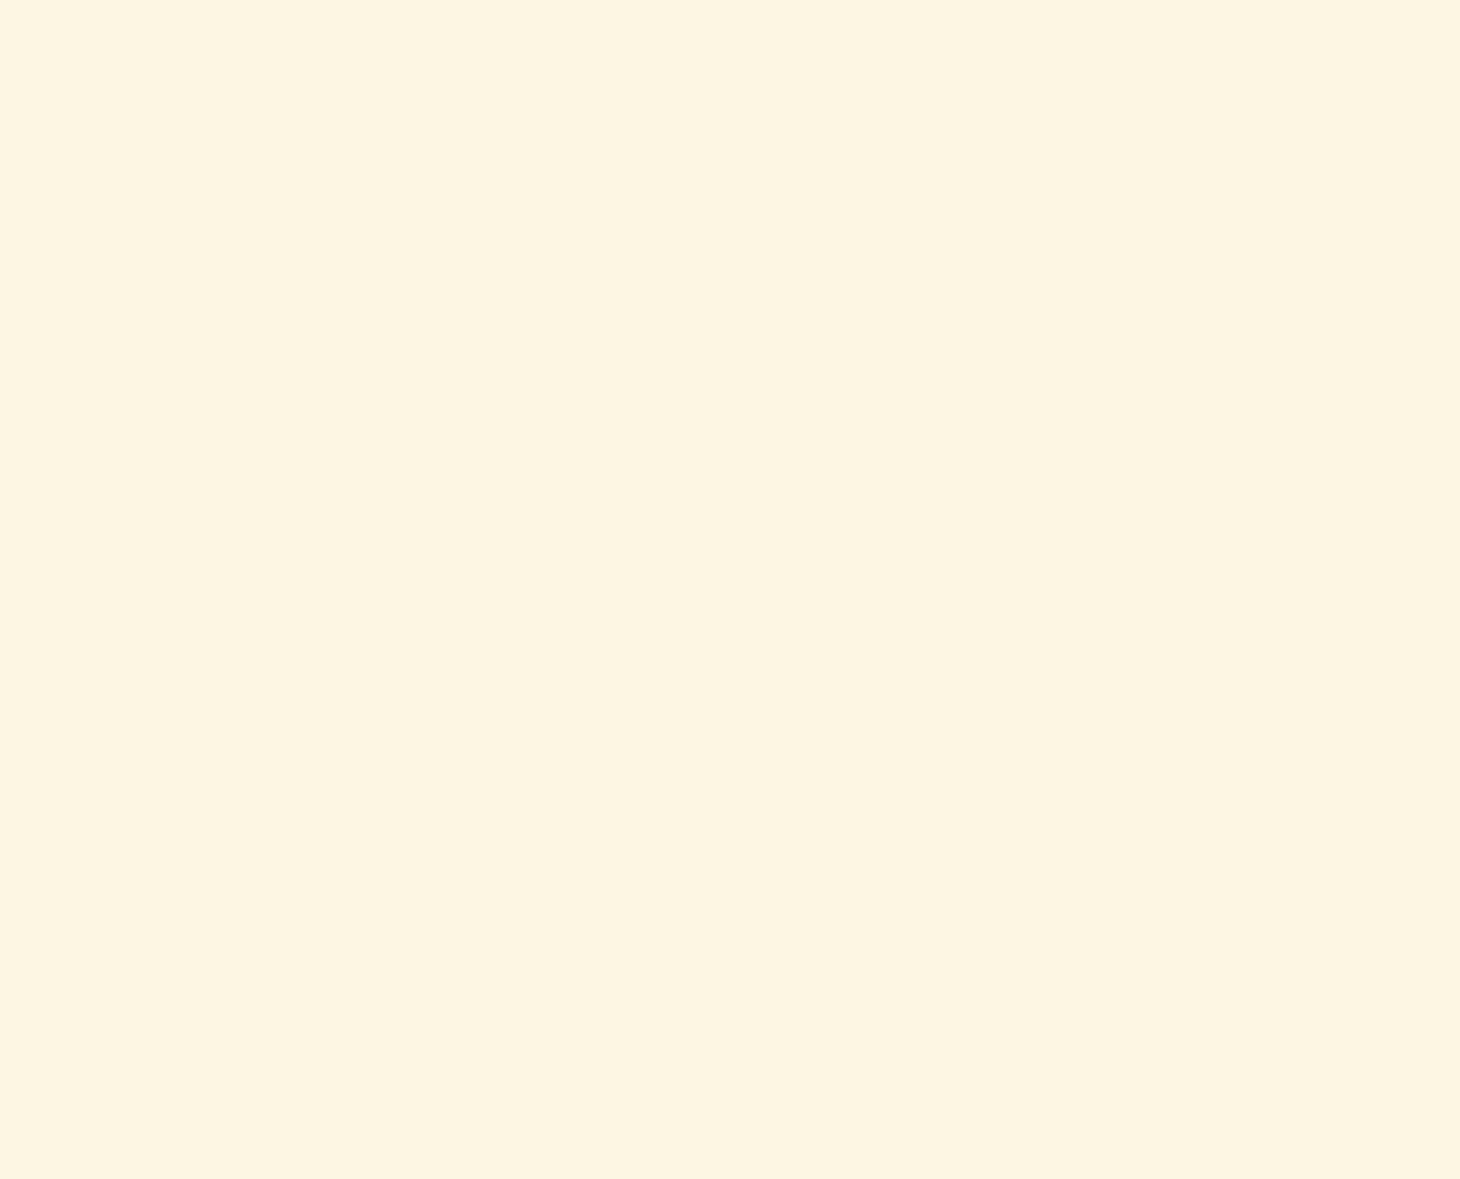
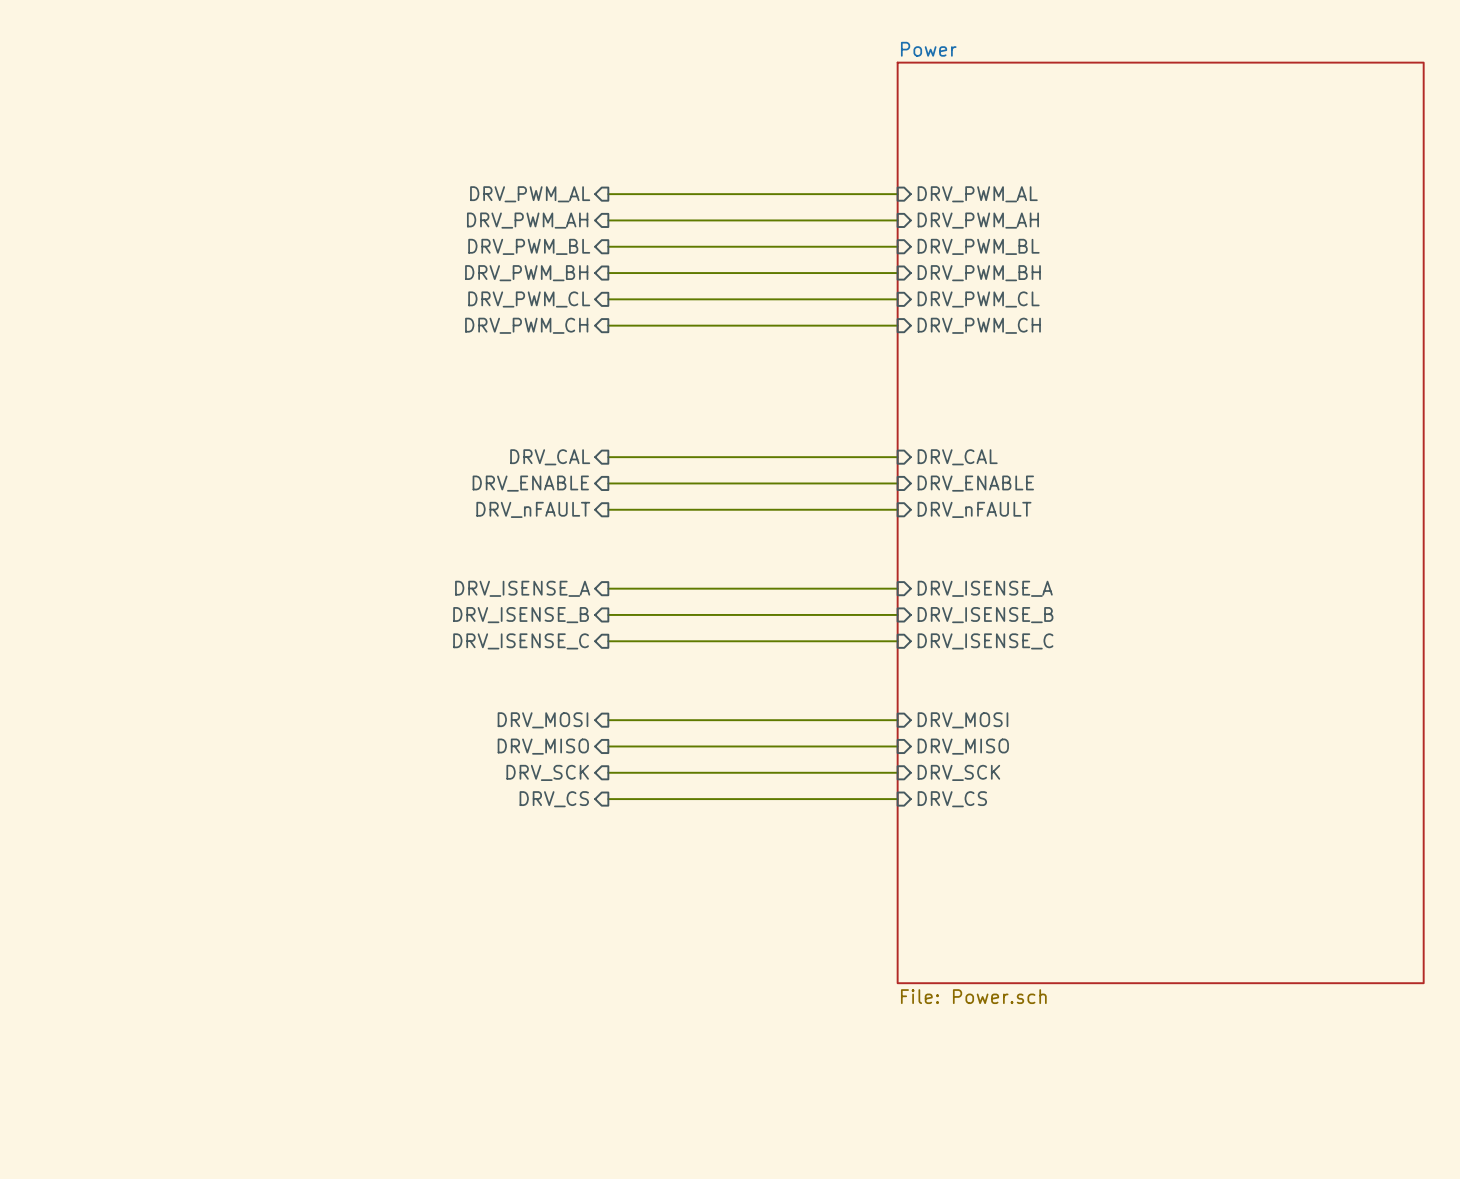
sheet pin: none -> DRV_PWM_AL (530, 194)
wire: none -> (608, 194) (897, 194)
sheet pin: none -> DRV_PWM_AL (977, 194)
sheet pin: none -> DRV_PWM_AH (527, 220)
wire: none -> (608, 220) (897, 220)
sheet pin: none -> DRV_PWM_AH (978, 220)
sheet pin: none -> DRV_PWM_BL (529, 246)
wire: none -> (608, 246) (897, 246)
sheet pin: none -> DRV_PWM_BL (978, 246)
sheet pin: none -> DRV_PWM_BH (526, 273)
wire: none -> (608, 273) (897, 273)
sheet pin: none -> DRV_PWM_BH (979, 273)
sheet pin: none -> DRV_PWM_CL (529, 299)
wire: none -> (608, 299) (897, 299)
sheet pin: none -> DRV_PWM_CL (978, 299)
sheet pin: none -> DRV_PWM_CH (526, 325)
wire: none -> (608, 325) (897, 325)
sheet pin: none -> DRV_PWM_CH (979, 325)
sheet pin: none -> DRV_CAL (550, 457)
wire: none -> (608, 457) (897, 457)
sheet pin: none -> DRV_CAL (957, 457)
sheet pin: none -> DRV_ENABLE (530, 483)
wire: none -> (608, 483) (897, 483)
sheet pin: none -> DRV_ENABLE (975, 483)
sheet pin: none -> DRV_nFAULT (533, 509)
wire: none -> (608, 509) (897, 509)
sheet pin: none -> DRV_nFAULT (974, 509)
sheet Power: none -> File: Power.sch (1160, 522)
sheet pin: none -> DRV_ISENSE_A (522, 588)
wire: none -> (608, 588) (897, 588)
sheet pin: none -> DRV_ISENSE_A (985, 588)
wire: none -> (608, 614) (897, 614)
sheet pin: none -> DRV_ISENSE_B (521, 615)
sheet pin: none -> DRV_ISENSE_B (985, 615)
sheet pin: none -> DRV_ISENSE_C (521, 641)
wire: none -> (608, 641) (897, 641)
sheet pin: none -> DRV_ISENSE_C (985, 641)
sheet pin: none -> DRV_MOSI (542, 720)
wire: none -> (608, 720) (897, 720)
sheet pin: none -> DRV_MOSI (962, 720)
sheet pin: none -> DRV_MISO (543, 746)
wire: none -> (608, 746) (897, 746)
sheet pin: none -> DRV_MISO (963, 746)
sheet pin: none -> DRV_SCK (547, 772)
wire: none -> (608, 772) (897, 772)
sheet pin: none -> DRV_SCK (958, 772)
sheet pin: none -> DRV_CS (554, 799)
wire: none -> (608, 799) (897, 799)
sheet pin: none -> DRV_CS (952, 799)

